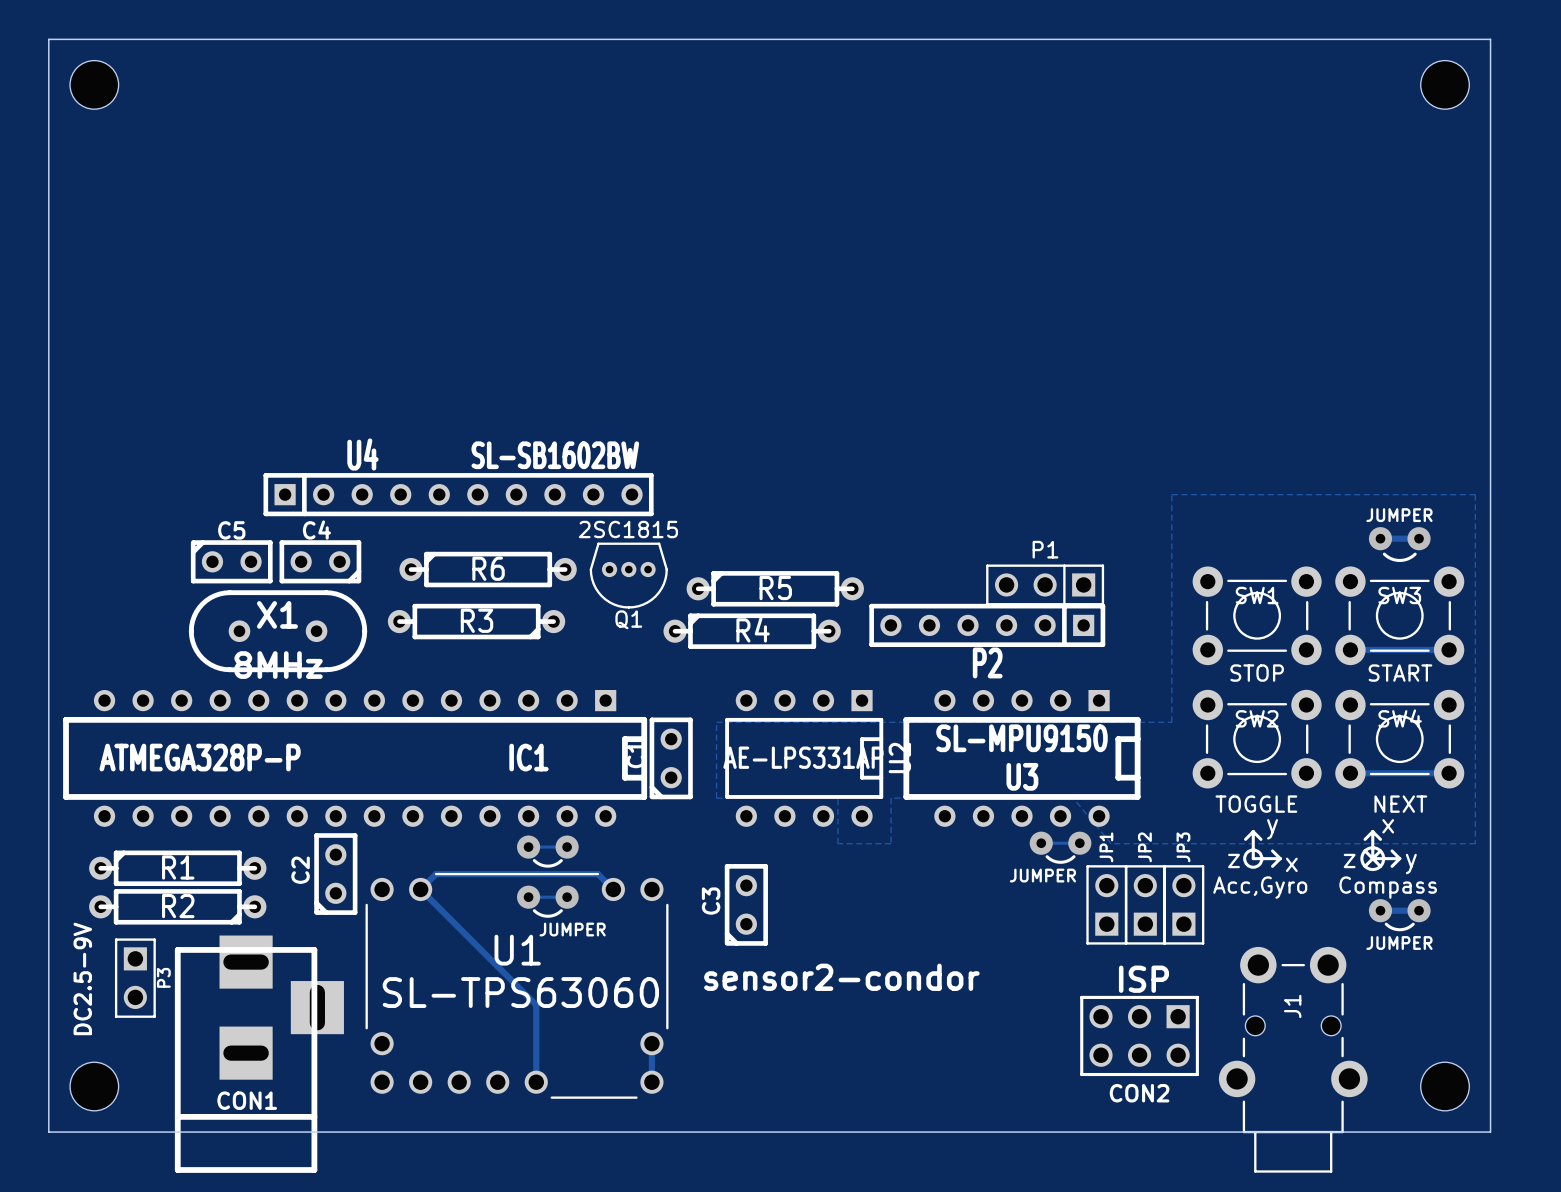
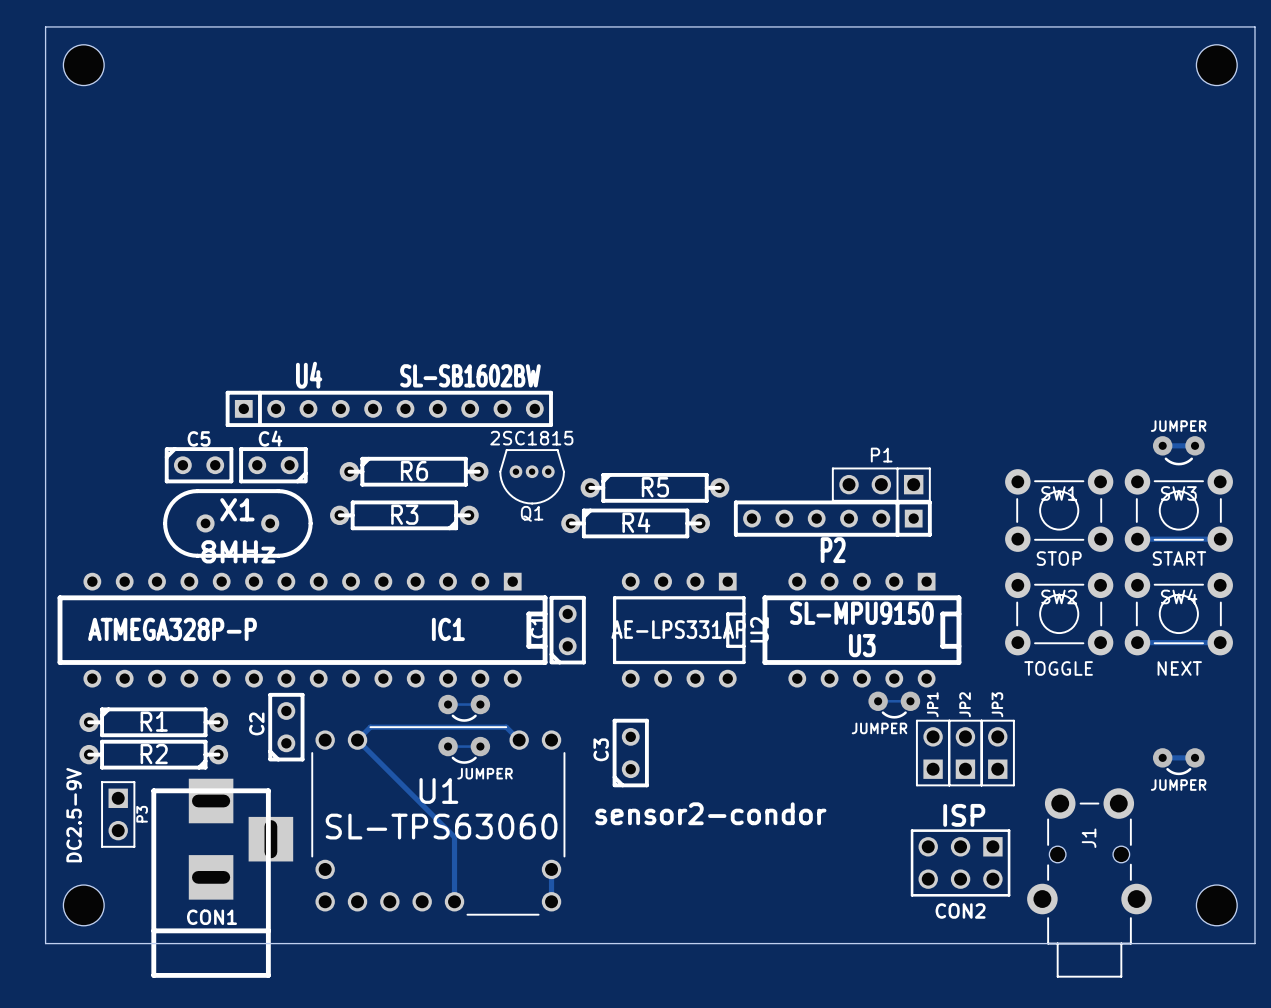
zone outline: (1171, 494) (1171, 722) (716, 722) (716, 798) (837, 798) (837, 843) (891, 843) (891, 798) (1073, 798) (1111, 843) (1475, 843) (1475, 494) (1171, 494) -> none
text: x (1388, 826) -> none
text: y (1272, 829) -> none
line: (1253, 831) (1260, 839) -> none
line: (1253, 831) (1245, 839) -> none
line: (1253, 831) (1253, 858) (1280, 858) -> none
line: (1372, 831) (1380, 839) -> none
line: (1372, 831) (1365, 839) -> none
line: (1372, 831) (1372, 858) (1399, 858) -> none
drawing: [1360, 846, 1386, 872] -> none
drawing: [1243, 848, 1264, 869] -> none
line: (1272, 850) (1280, 858) -> none
line: (1365, 850) (1380, 866) -> none
line: (1380, 850) (1365, 866) -> none
line: (1392, 850) (1399, 858) -> none
line: (1280, 858) (1272, 866) -> none
line: (1399, 858) (1392, 866) -> none
text: z (1234, 860) -> none
text: z (1349, 860) -> none
text: x (1291, 864) -> none
text: y (1411, 864) -> none
text: Acc,Gyro (1260, 887) -> none
text: Compass (1388, 887) -> none

